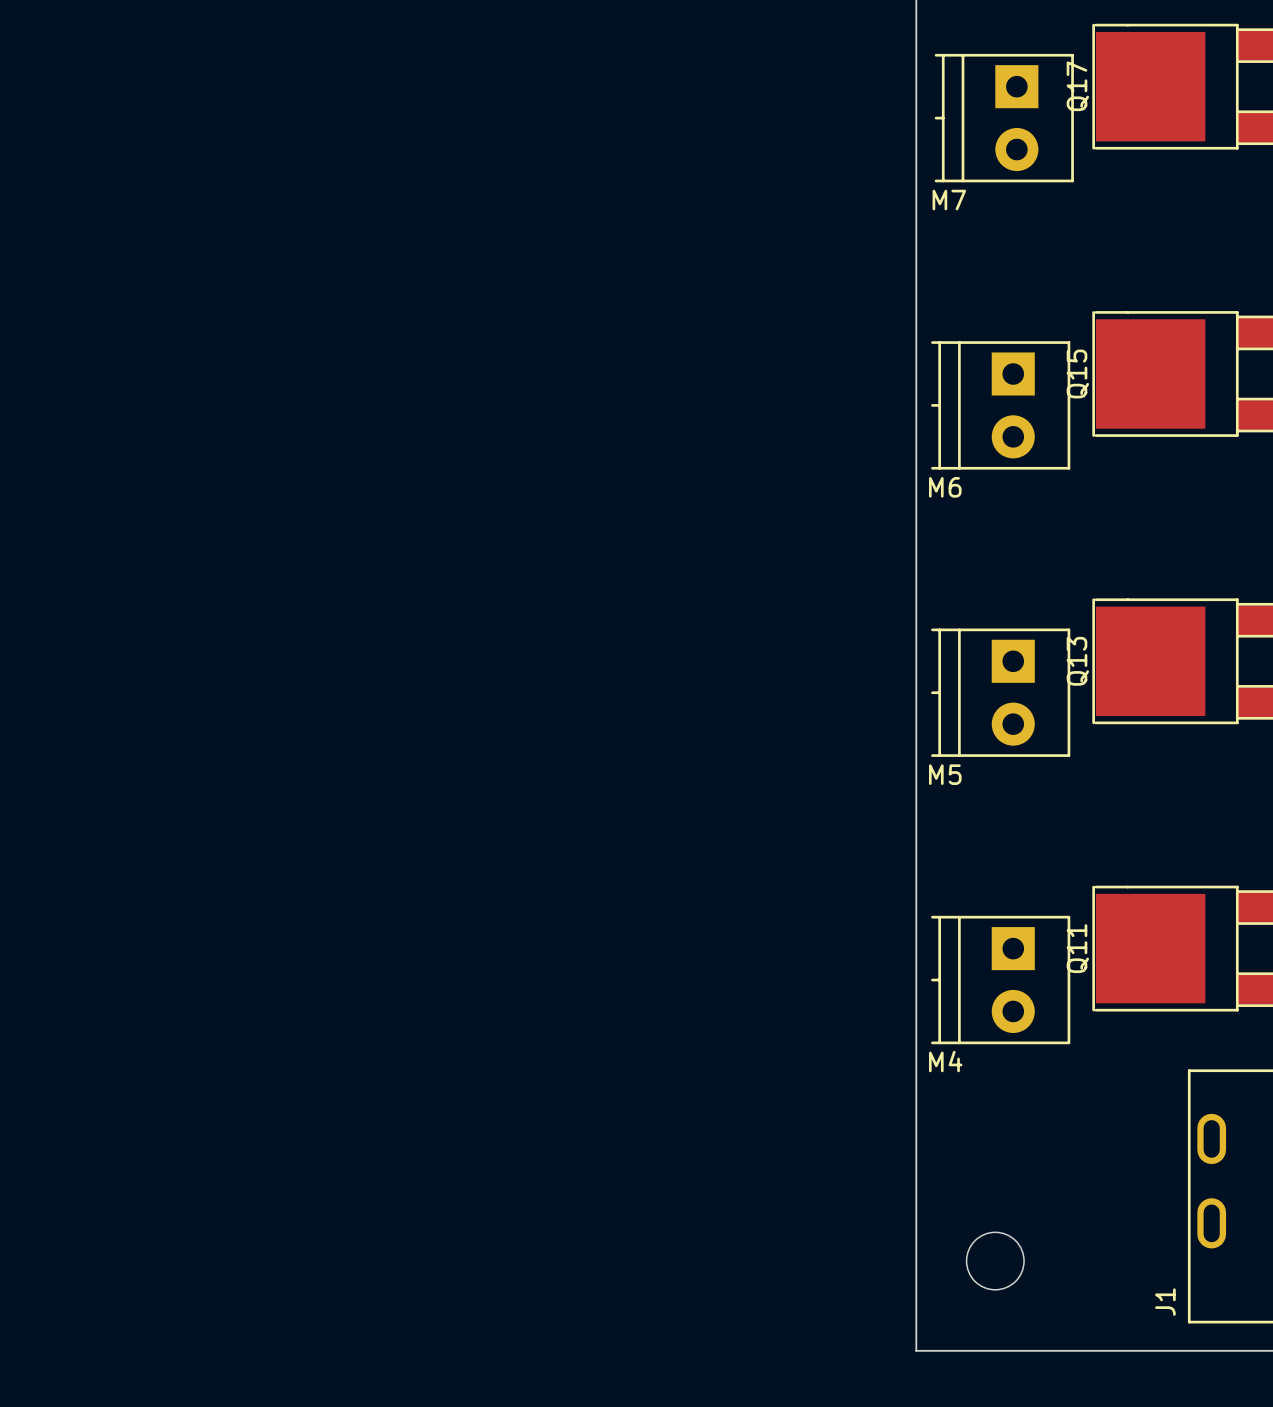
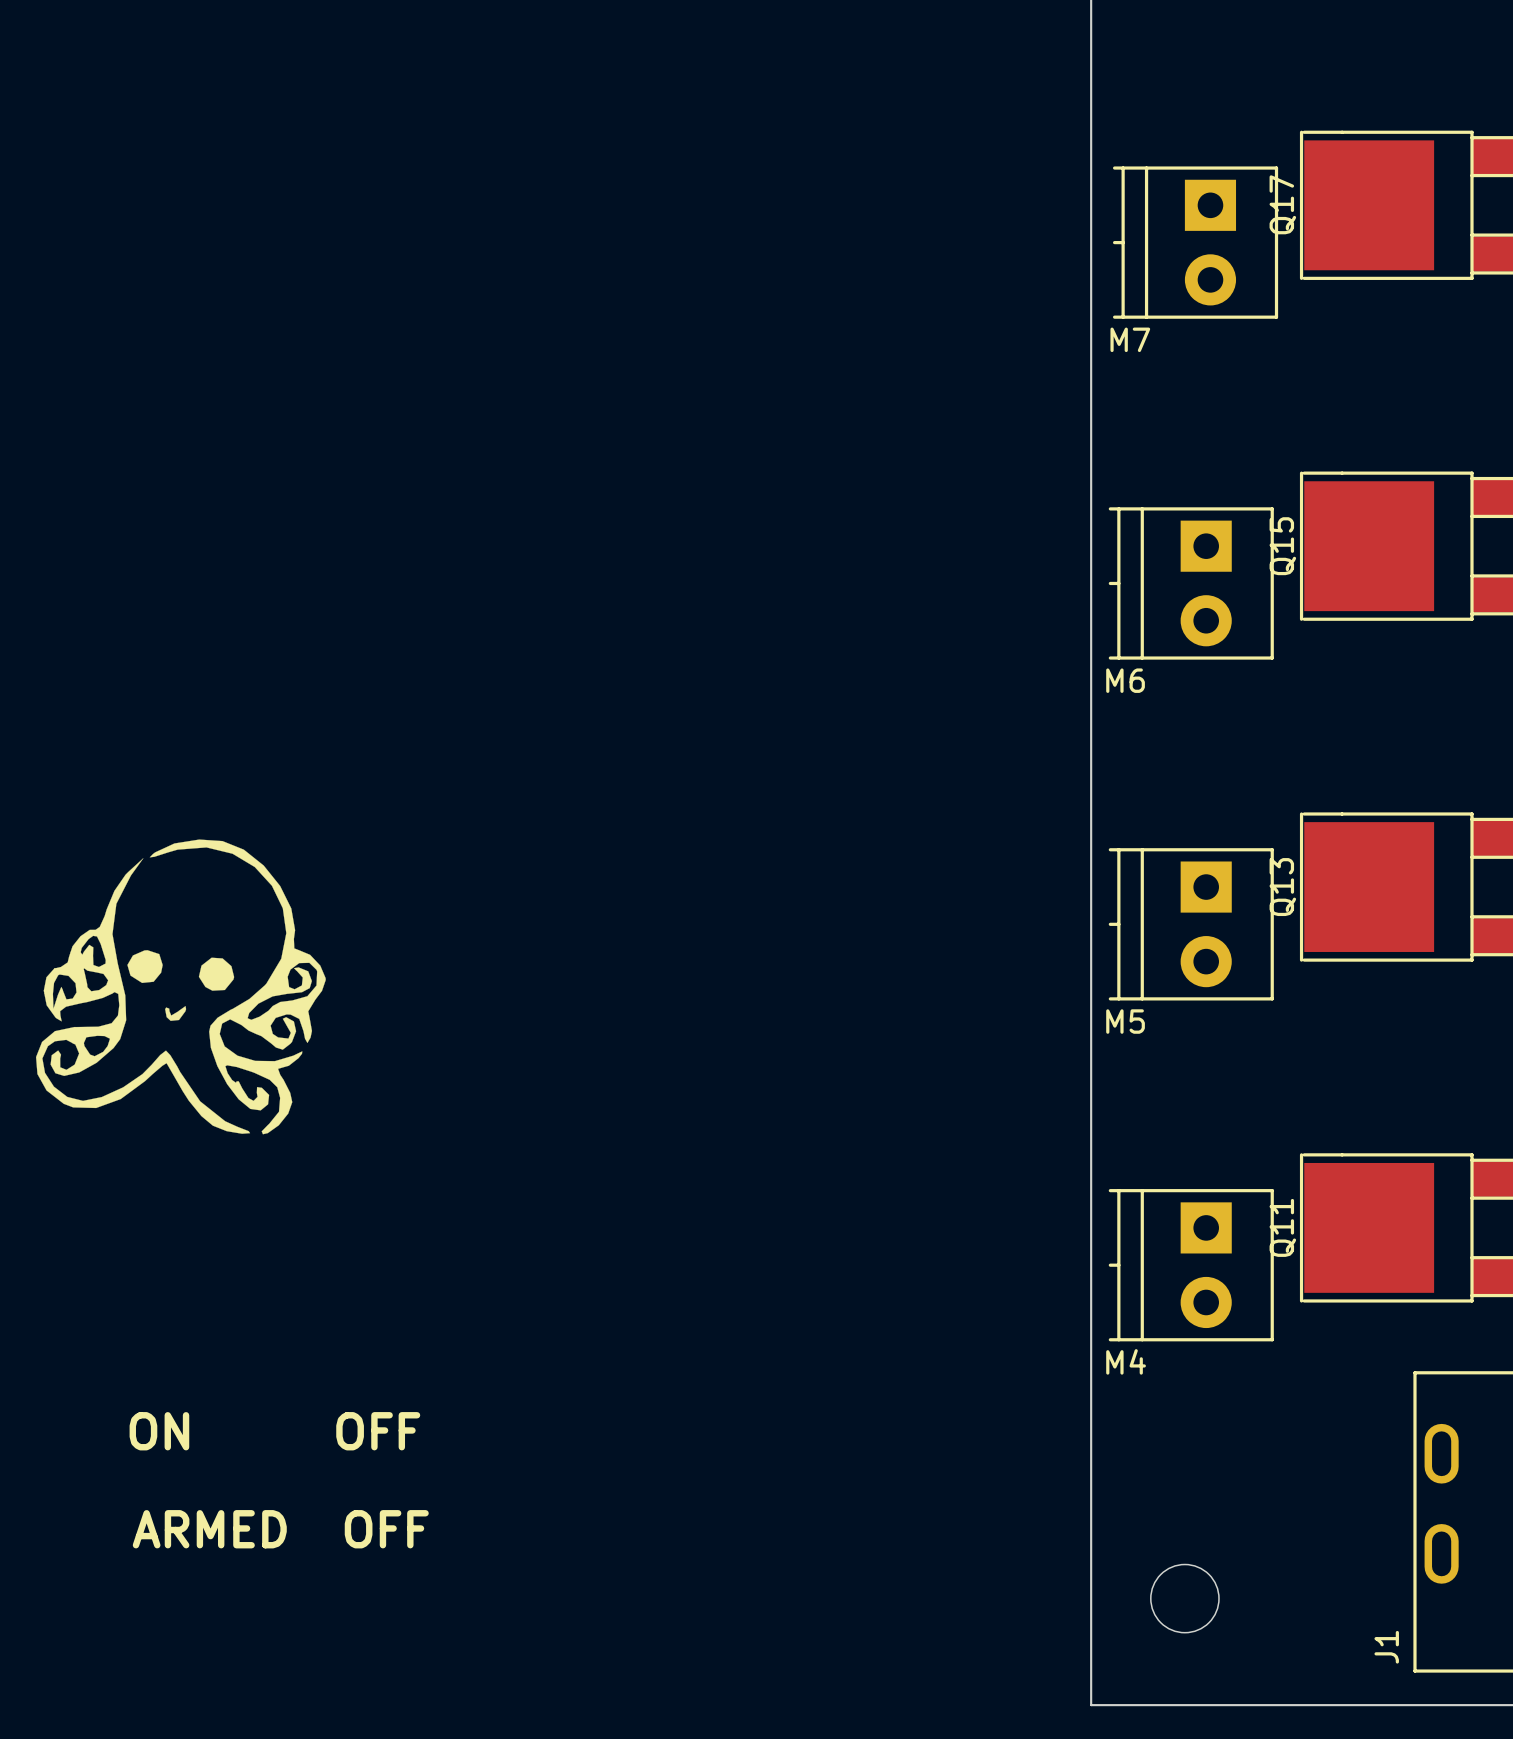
drawing: none -> [35, 839, 326, 1135]
text: none -> ON (159, 1431)
text: none -> OFF (378, 1431)
text: none -> ARMED (209, 1529)
text: none -> OFF (386, 1529)

